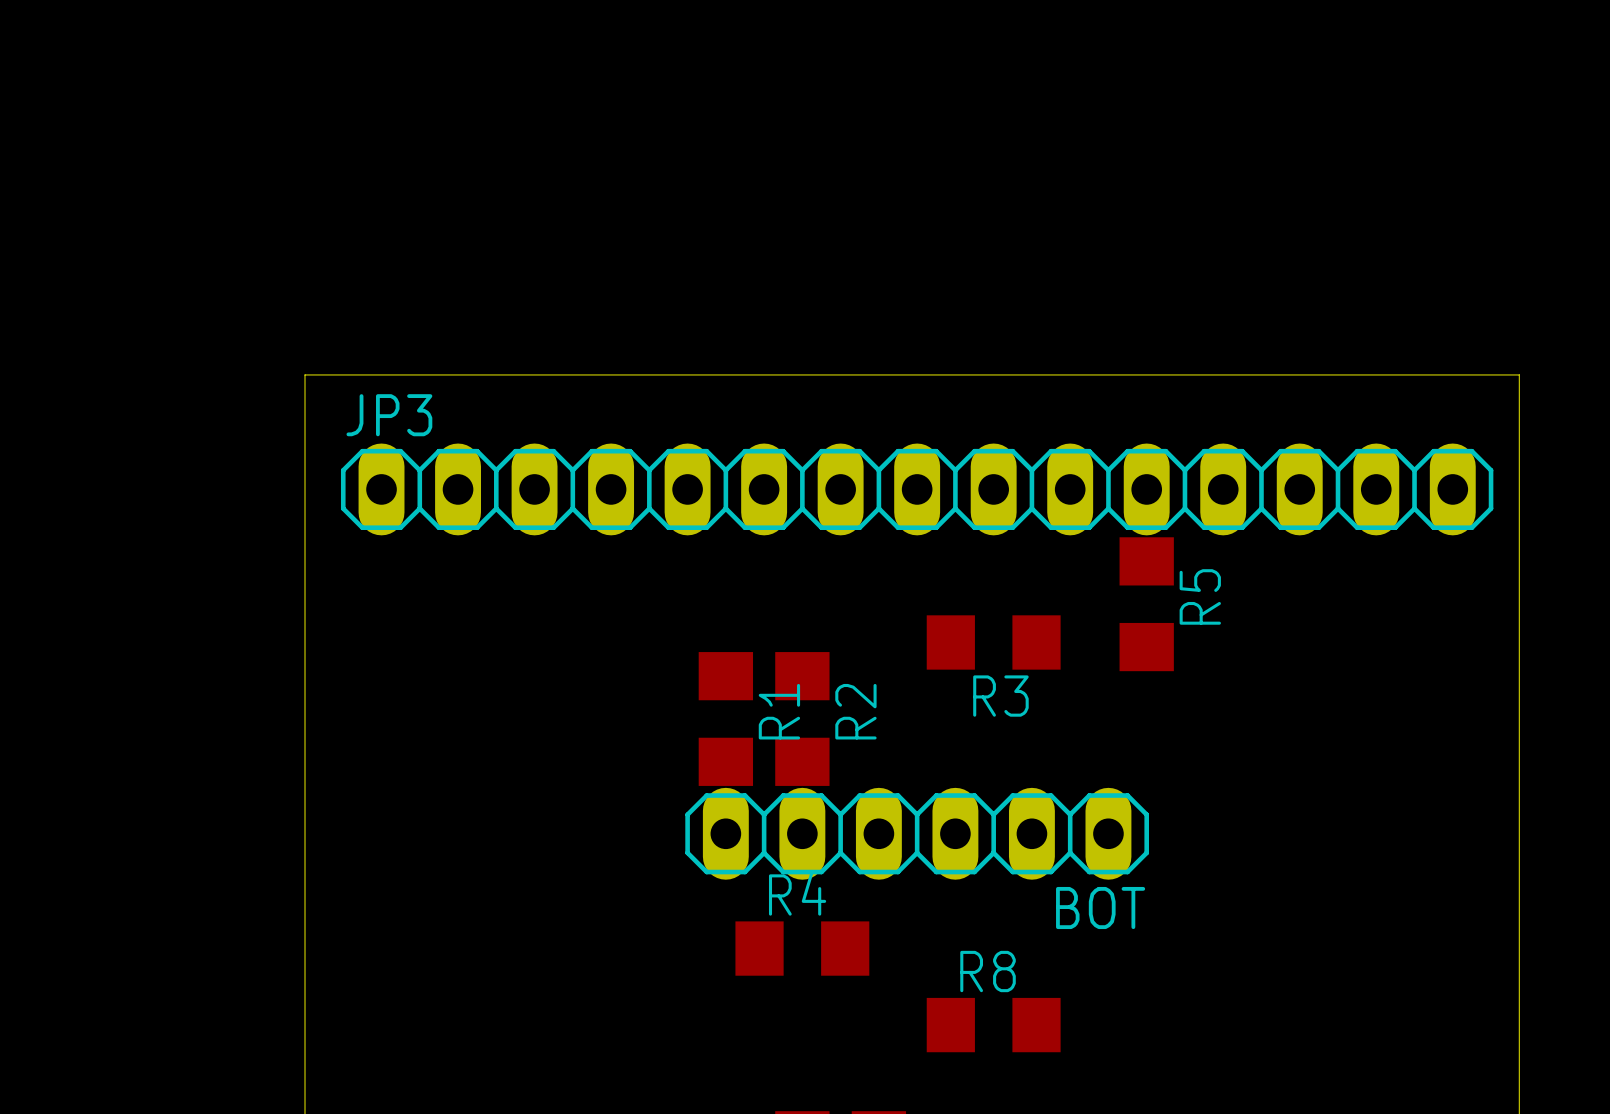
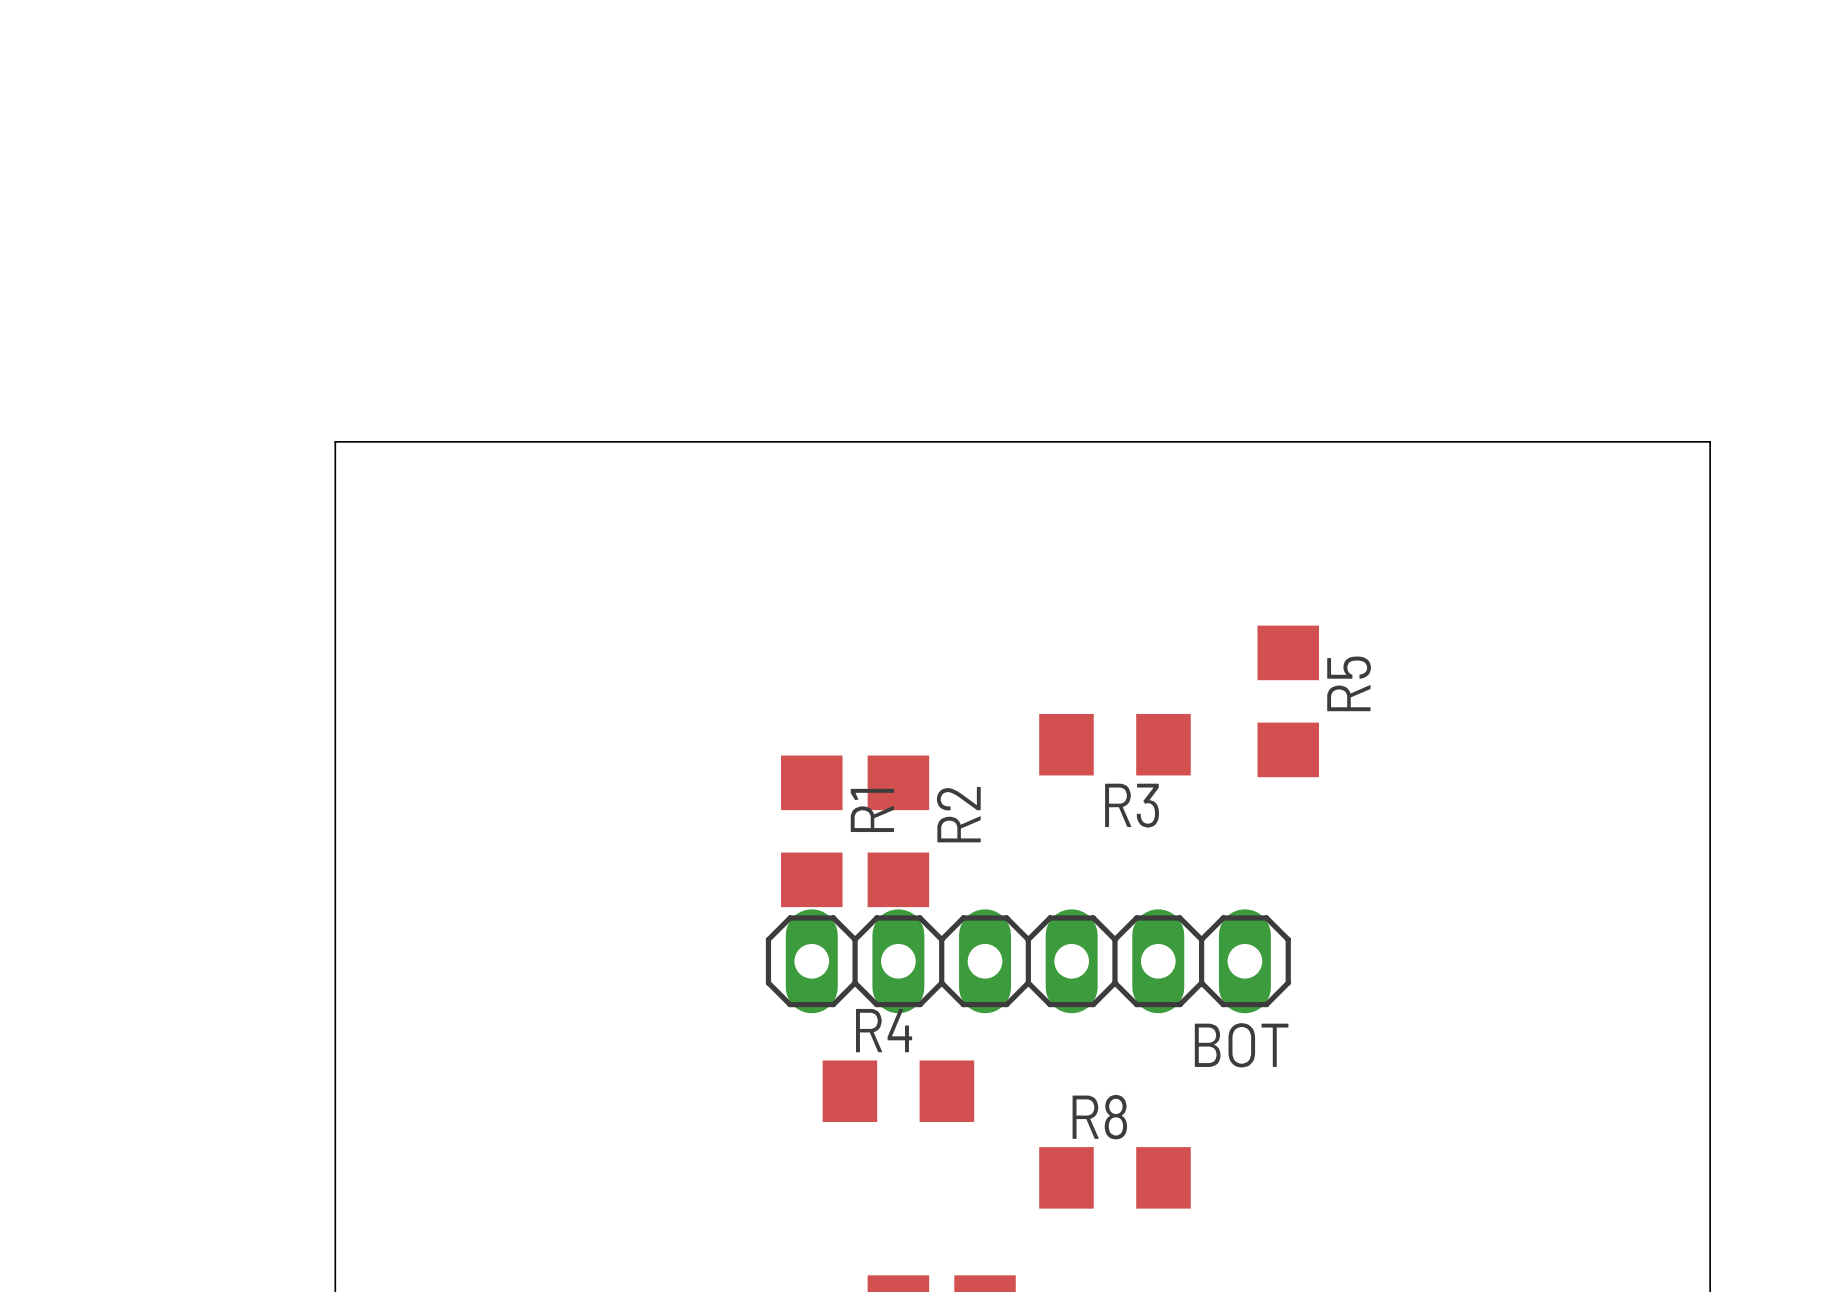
JP3: (917, 489) -> none

